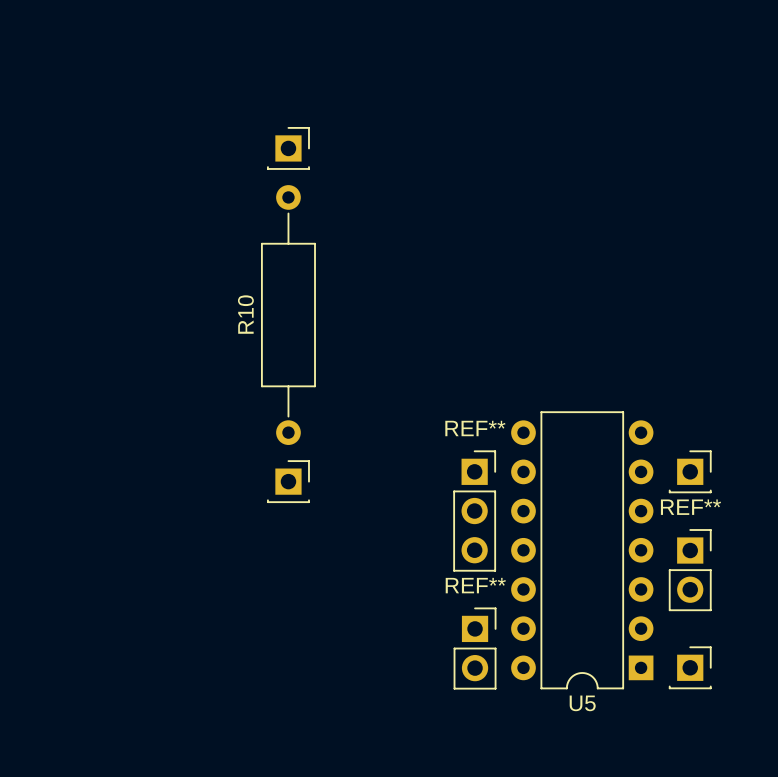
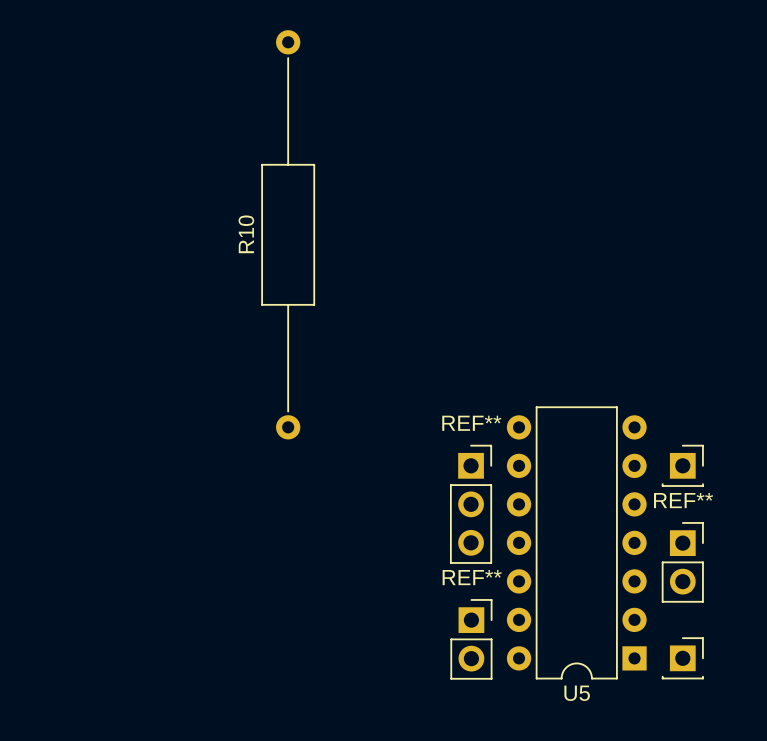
part: (288, 148) -> none
R10 footprint: [261, 185, 316, 445] -> [261, 30, 316, 440]
part: (288, 481) -> none

